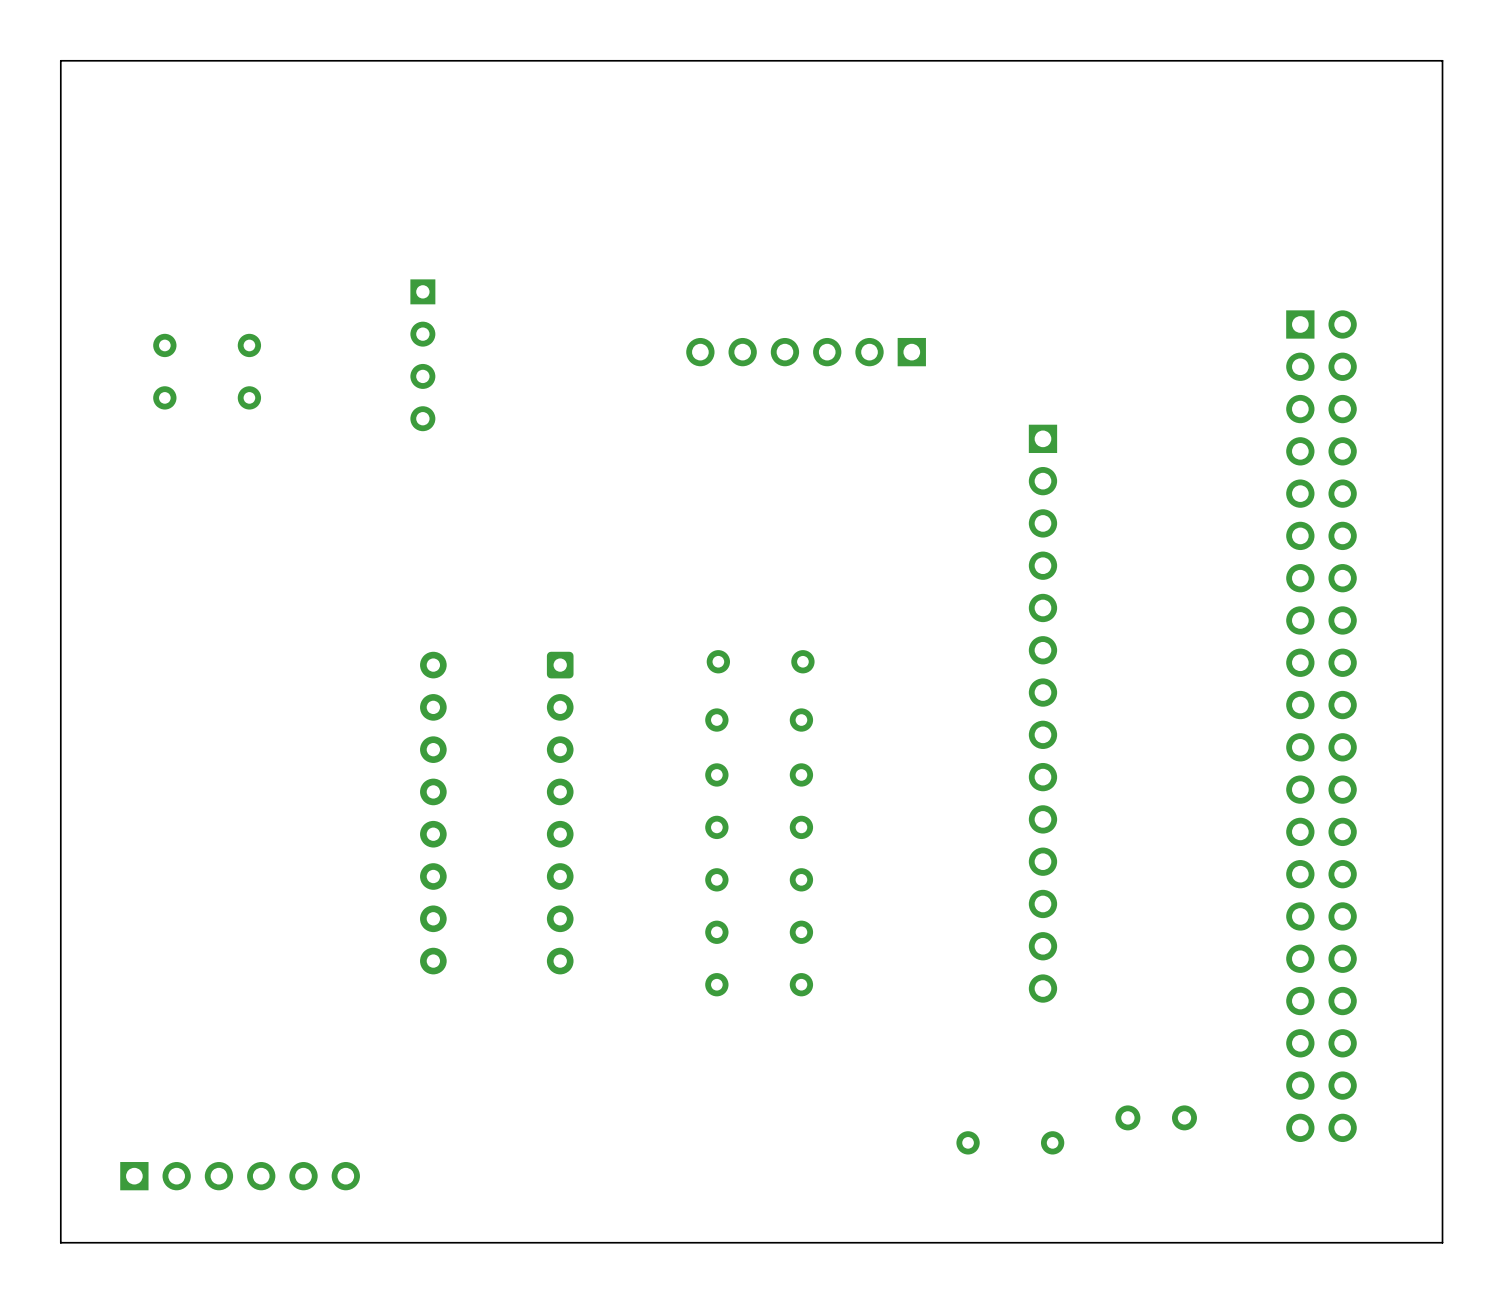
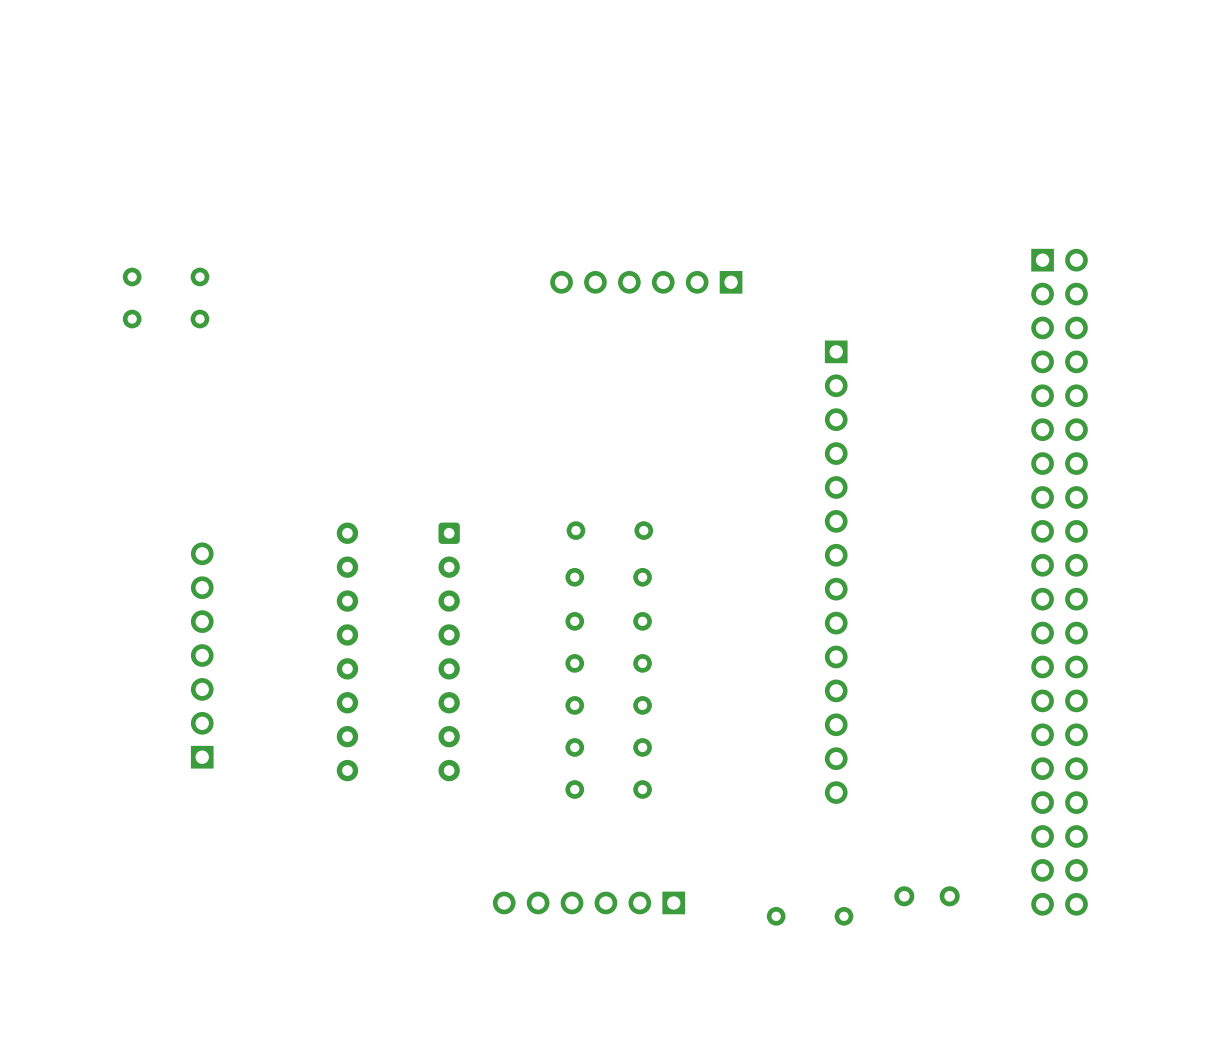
board edge: (1442, 60) (60, 60) (60, 1242) (1442, 1242) (1442, 60) -> none
part: (422, 355) -> none
part: none -> (202, 655)
part: none -> (588, 902)
part: (240, 1176) -> none

